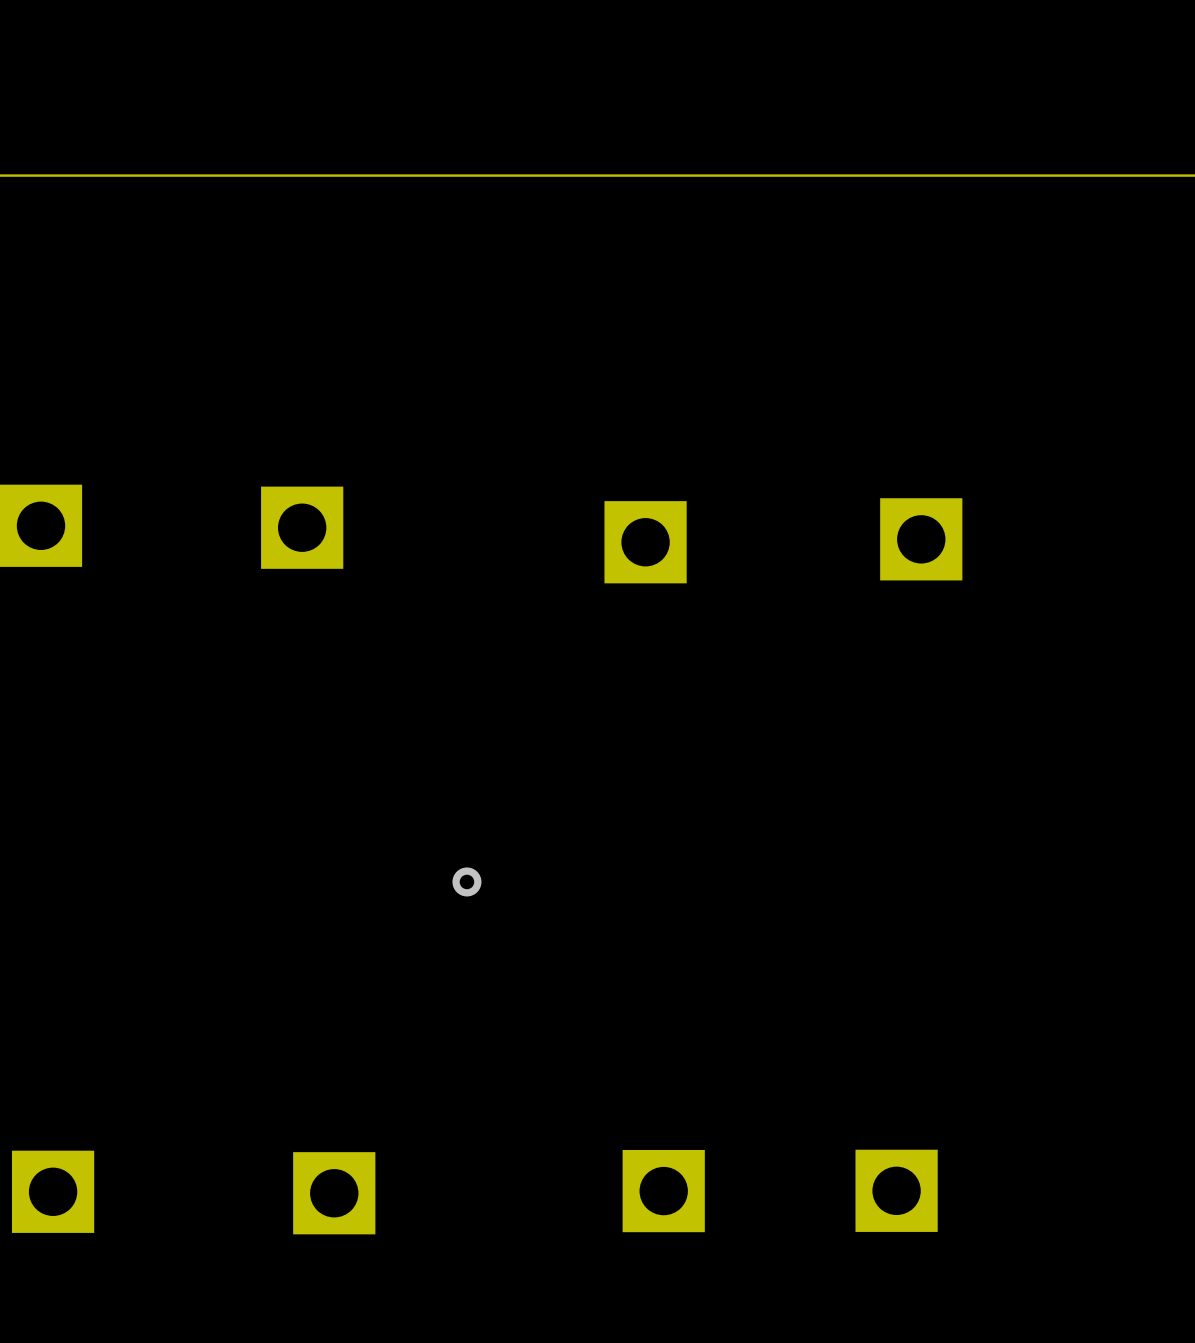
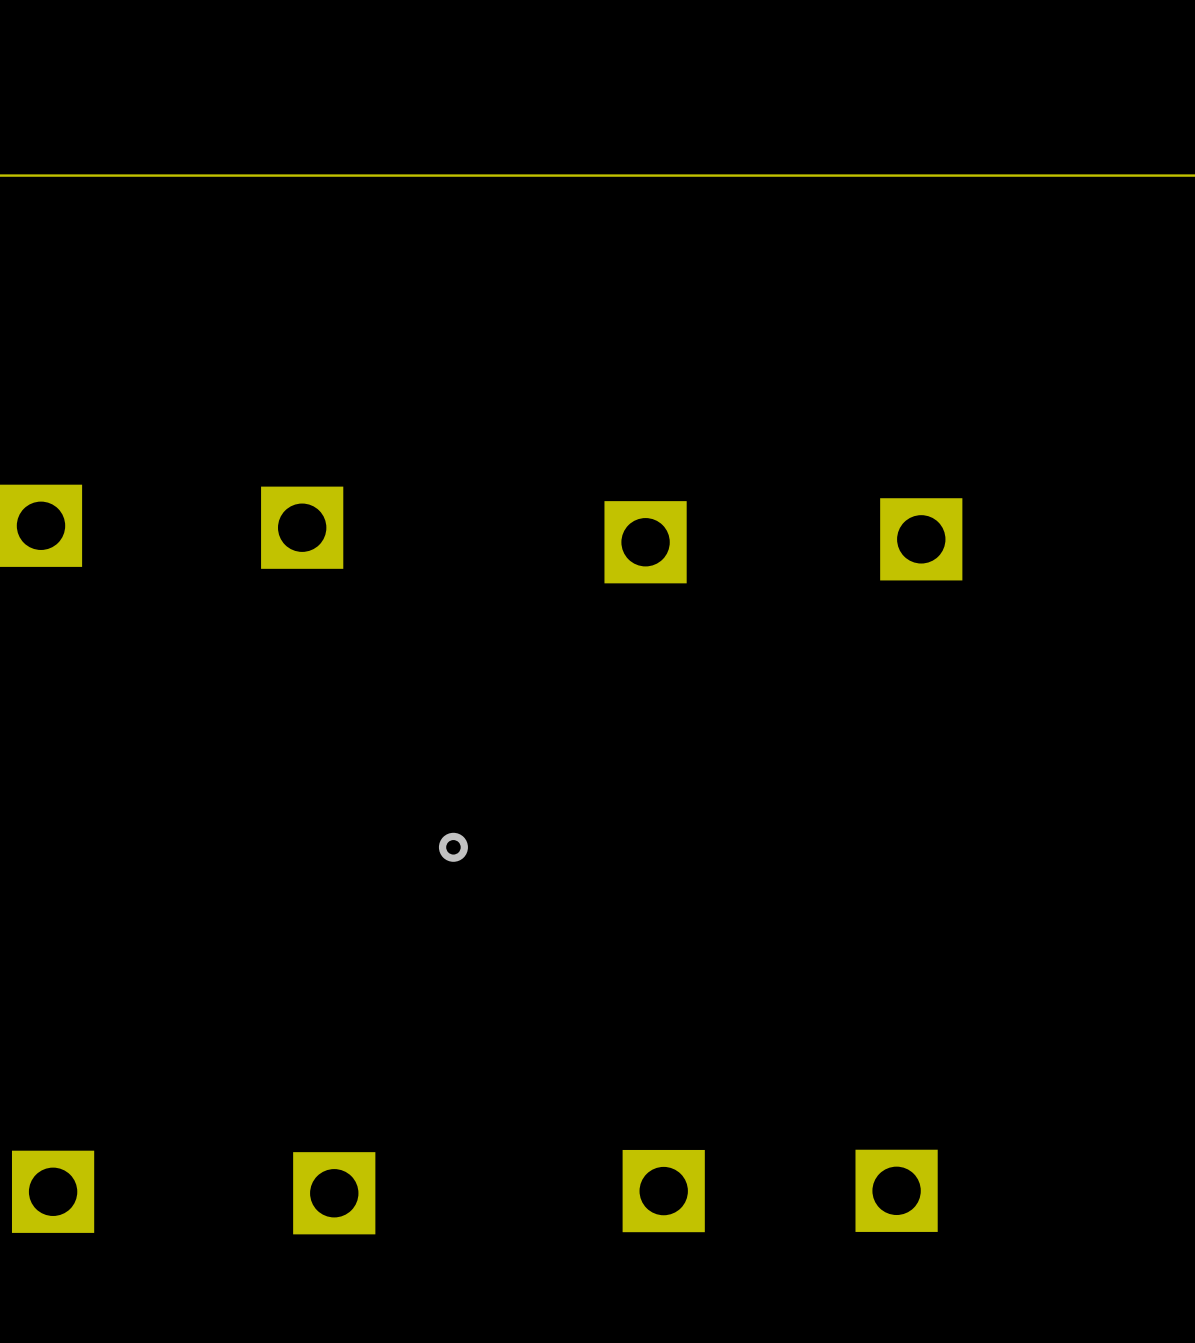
via position: (466, 881) -> (453, 847)

